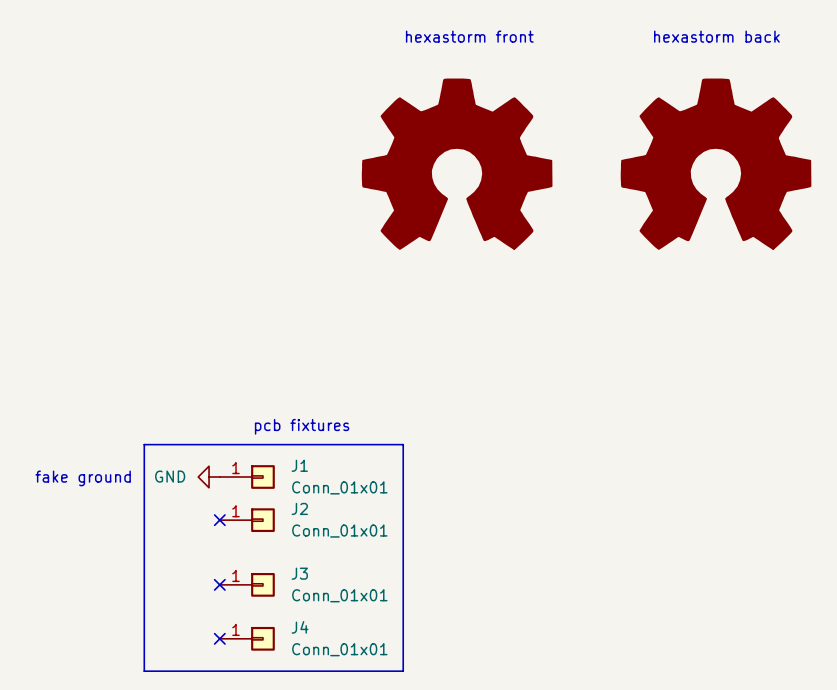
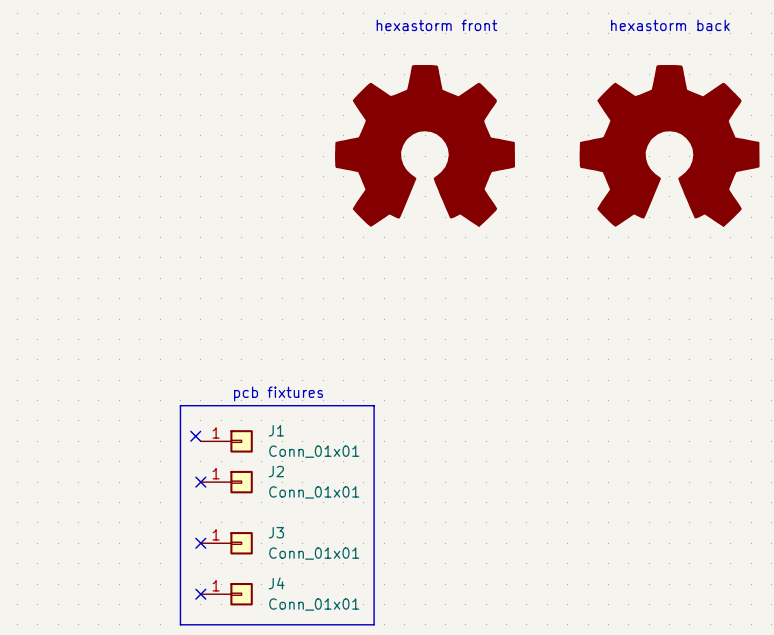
line: (403, 444) (144, 444) (144, 671) (198, 671) -> (374, 410) (374, 405) (180, 405) (180, 624)
no-connect mark: none -> (195, 436)
power symbol: GND (209, 477) -> none
text: fake ground (83, 478) -> none

